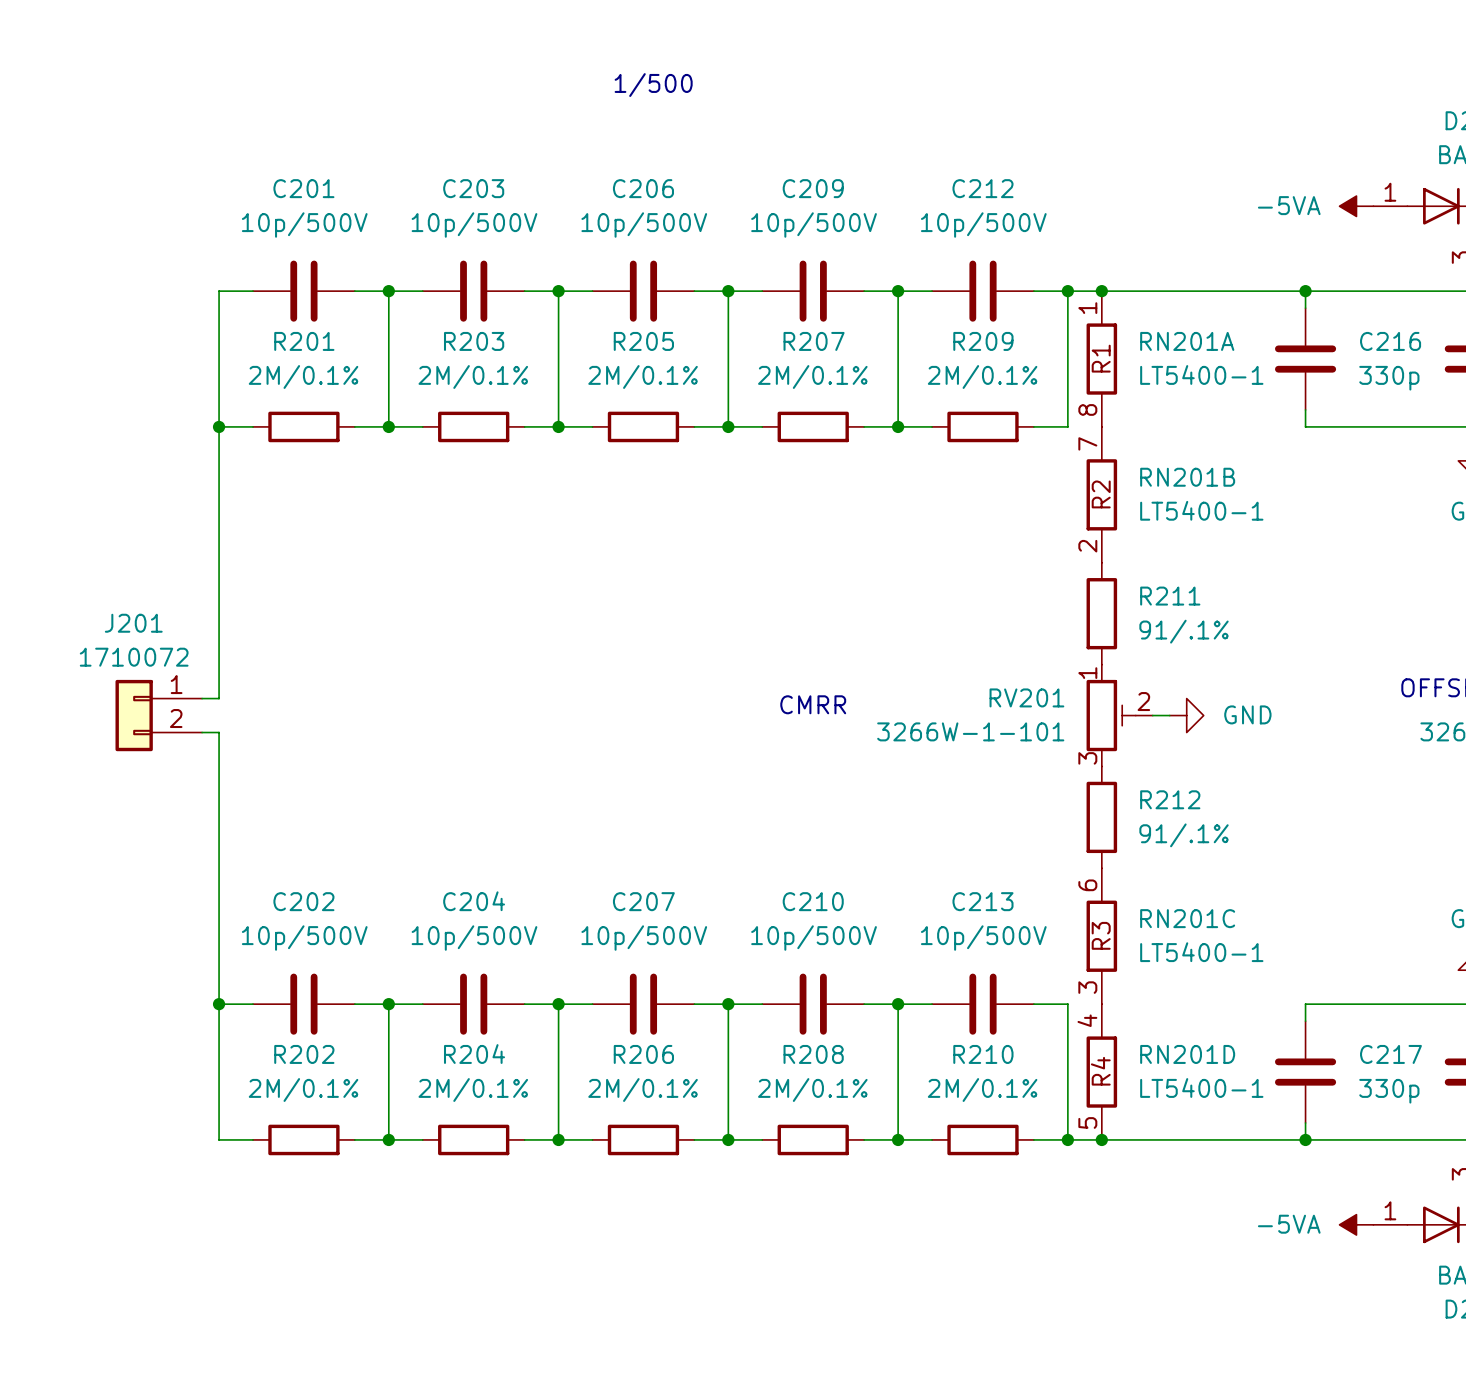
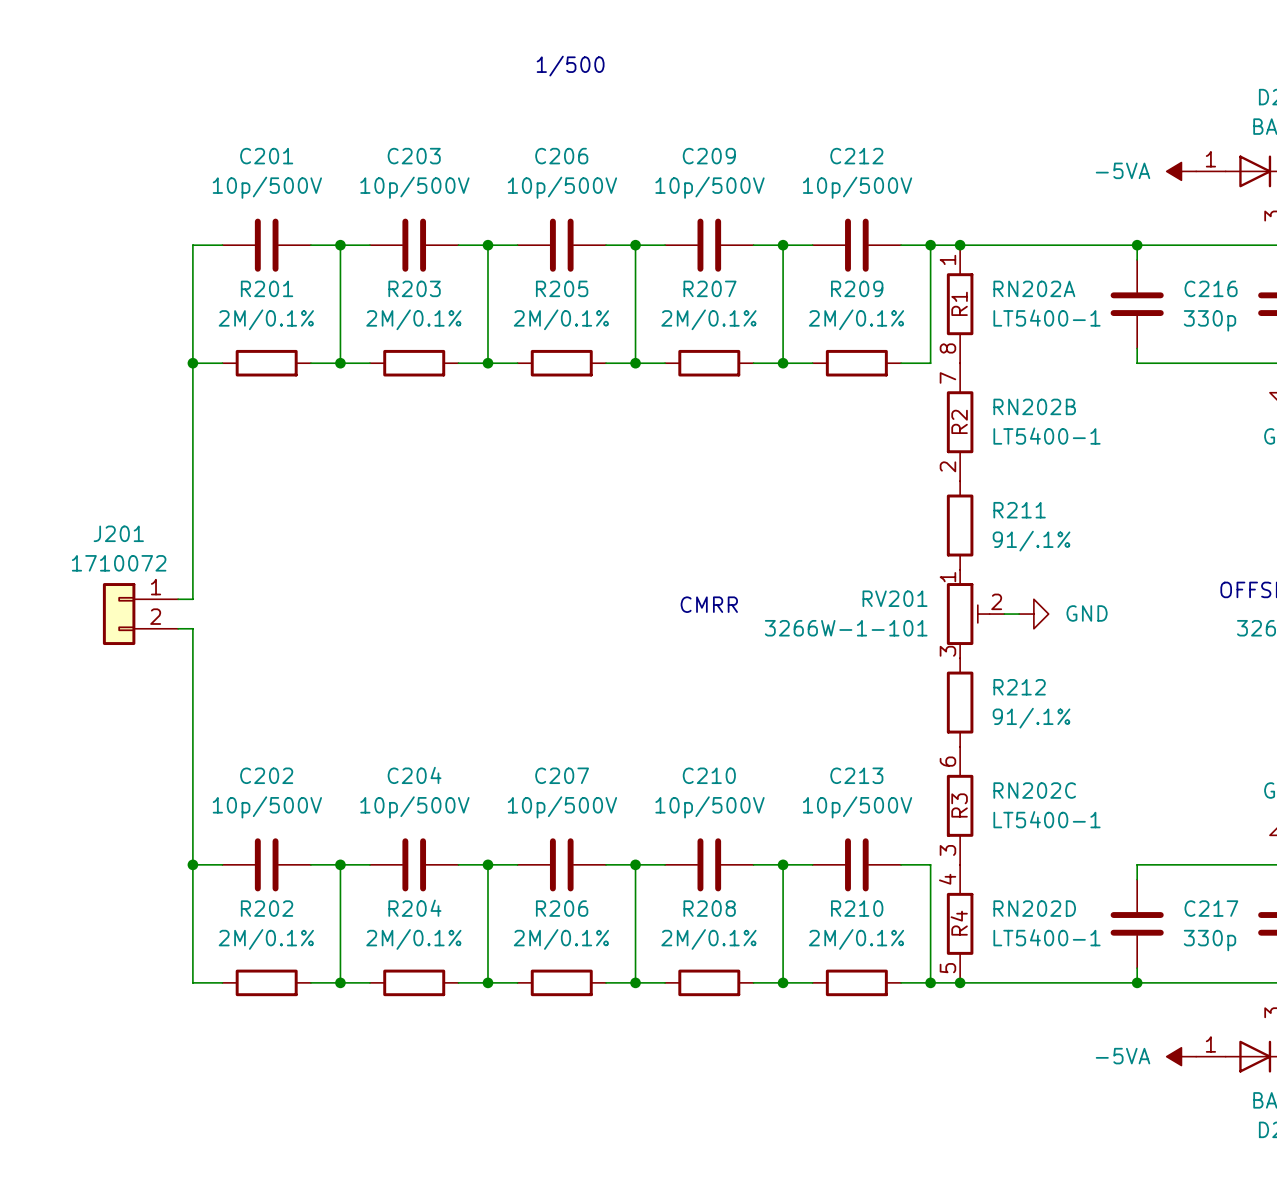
RN201A name: RN201A (1187, 341) -> RN202A (1034, 288)
RN201B name: RN201B (1187, 477) -> RN202B (1034, 406)
RN201C name: RN201C (1187, 918) -> RN202C (1034, 790)
RN201D name: RN201D (1187, 1054) -> RN202D (1034, 908)

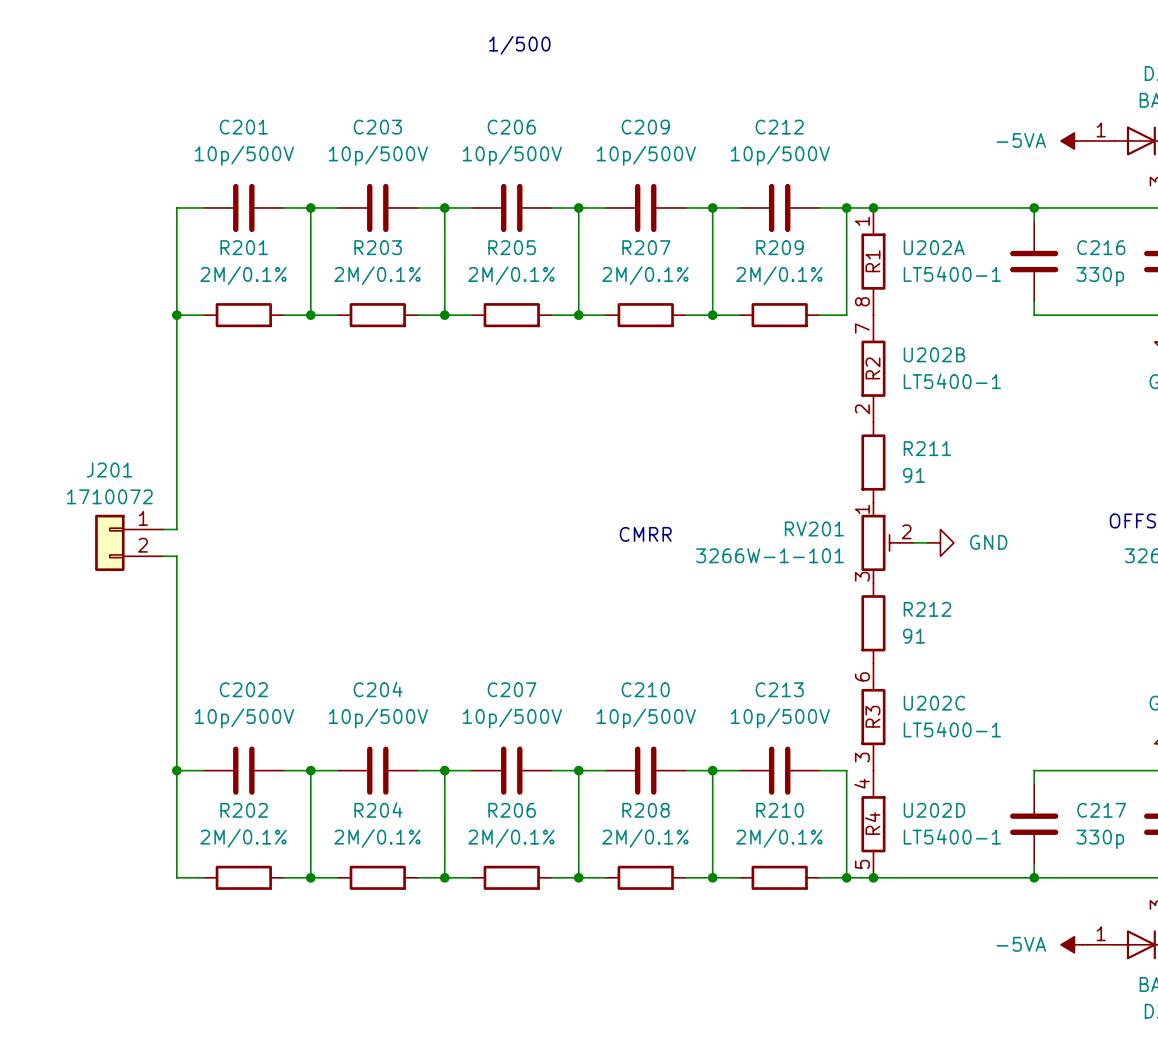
RN202A name: RN202A (1034, 288) -> U202A (934, 247)
RN202B name: RN202B (1034, 406) -> U202B (934, 354)
R211 value: 91/.1% (1031, 541) -> 91 (914, 475)
R212 value: 91/.1% (1031, 718) -> 91 (914, 636)
RN202C name: RN202C (1034, 790) -> U202C (934, 703)
RN202D name: RN202D (1034, 908) -> U202D (934, 810)

